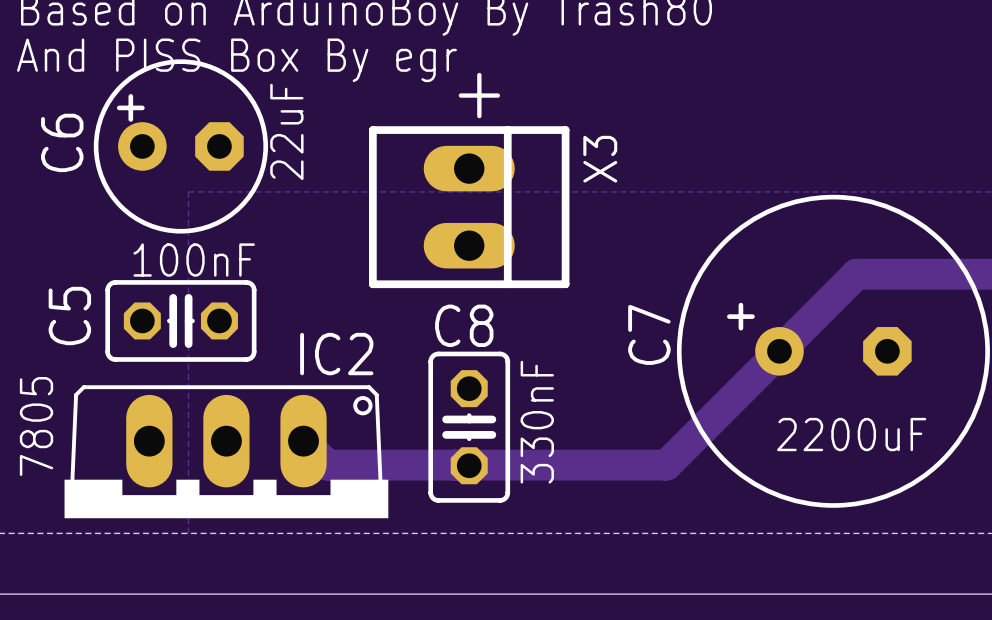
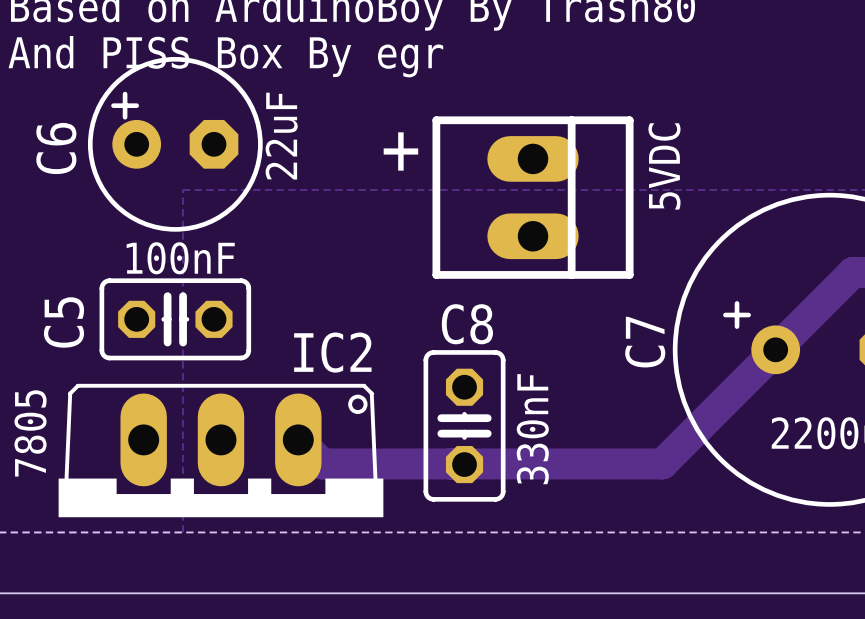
text position: + (479, 95) -> + (400, 151)
5VDC: none -> (533, 197)
X3: (469, 207) -> none

